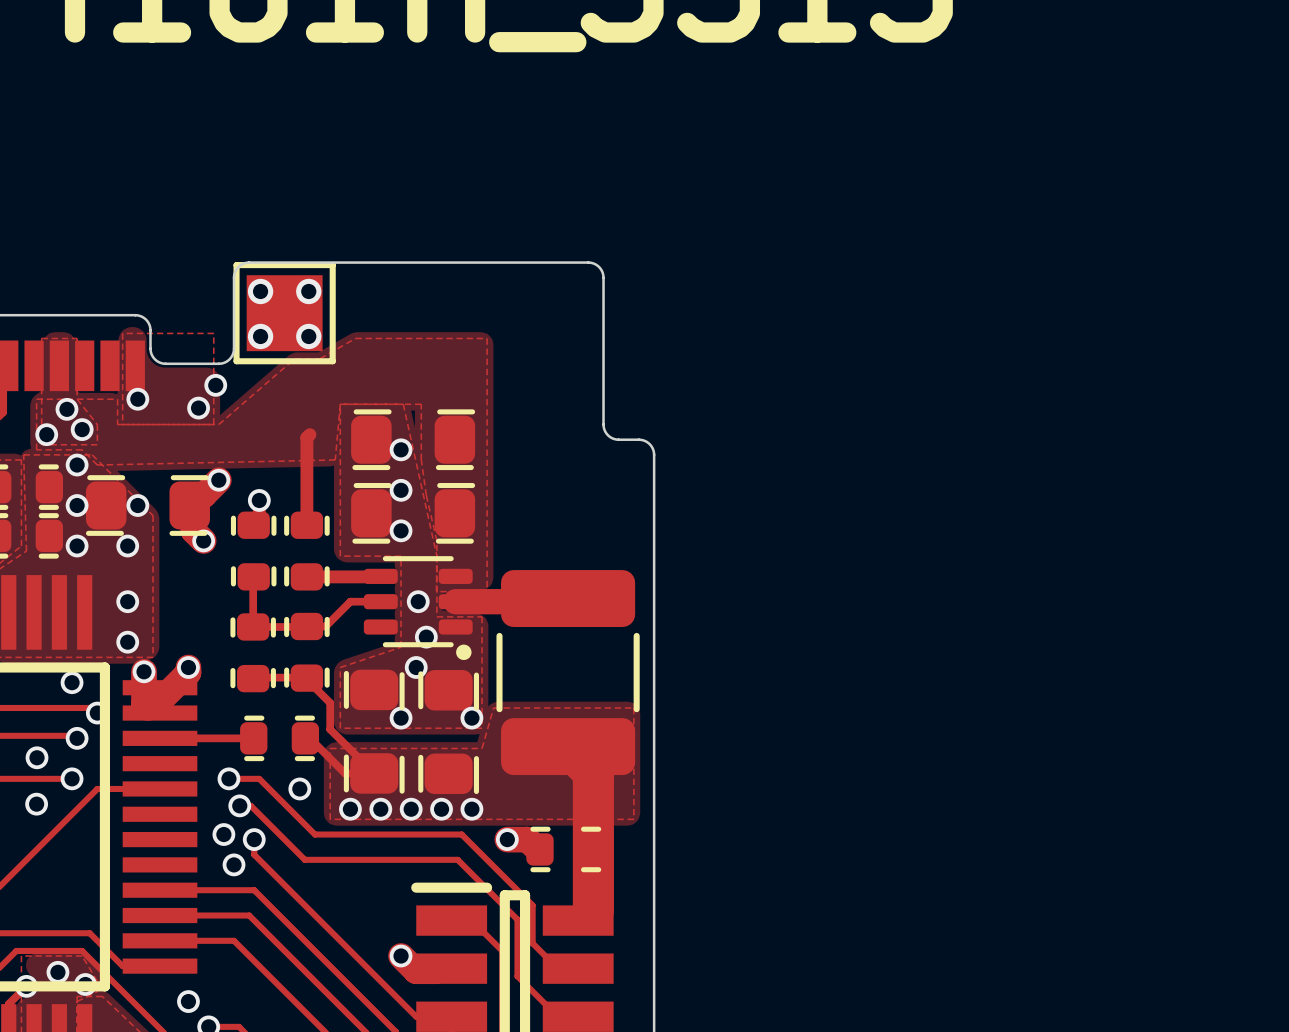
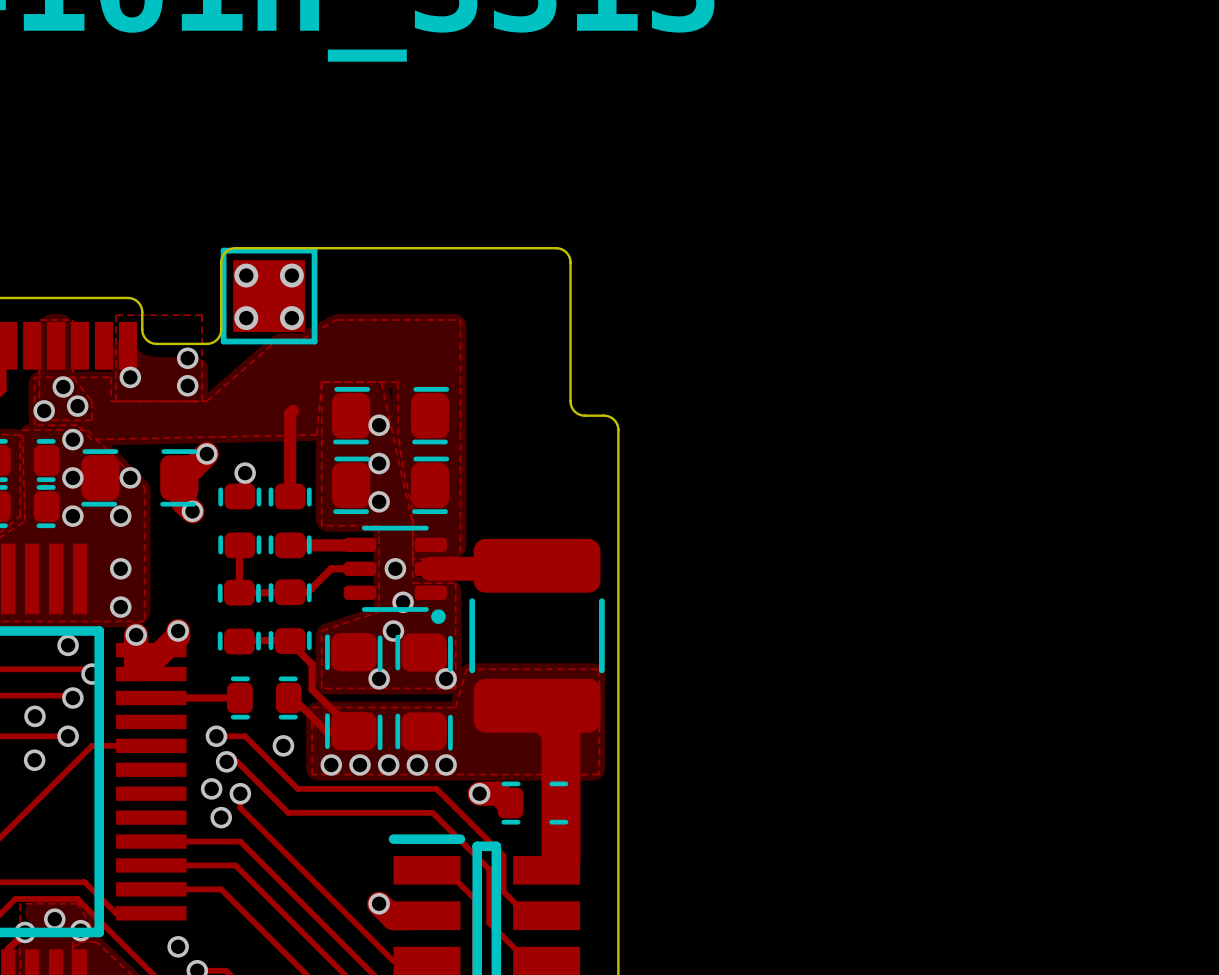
via position: (215, 385) -> (187, 358)

